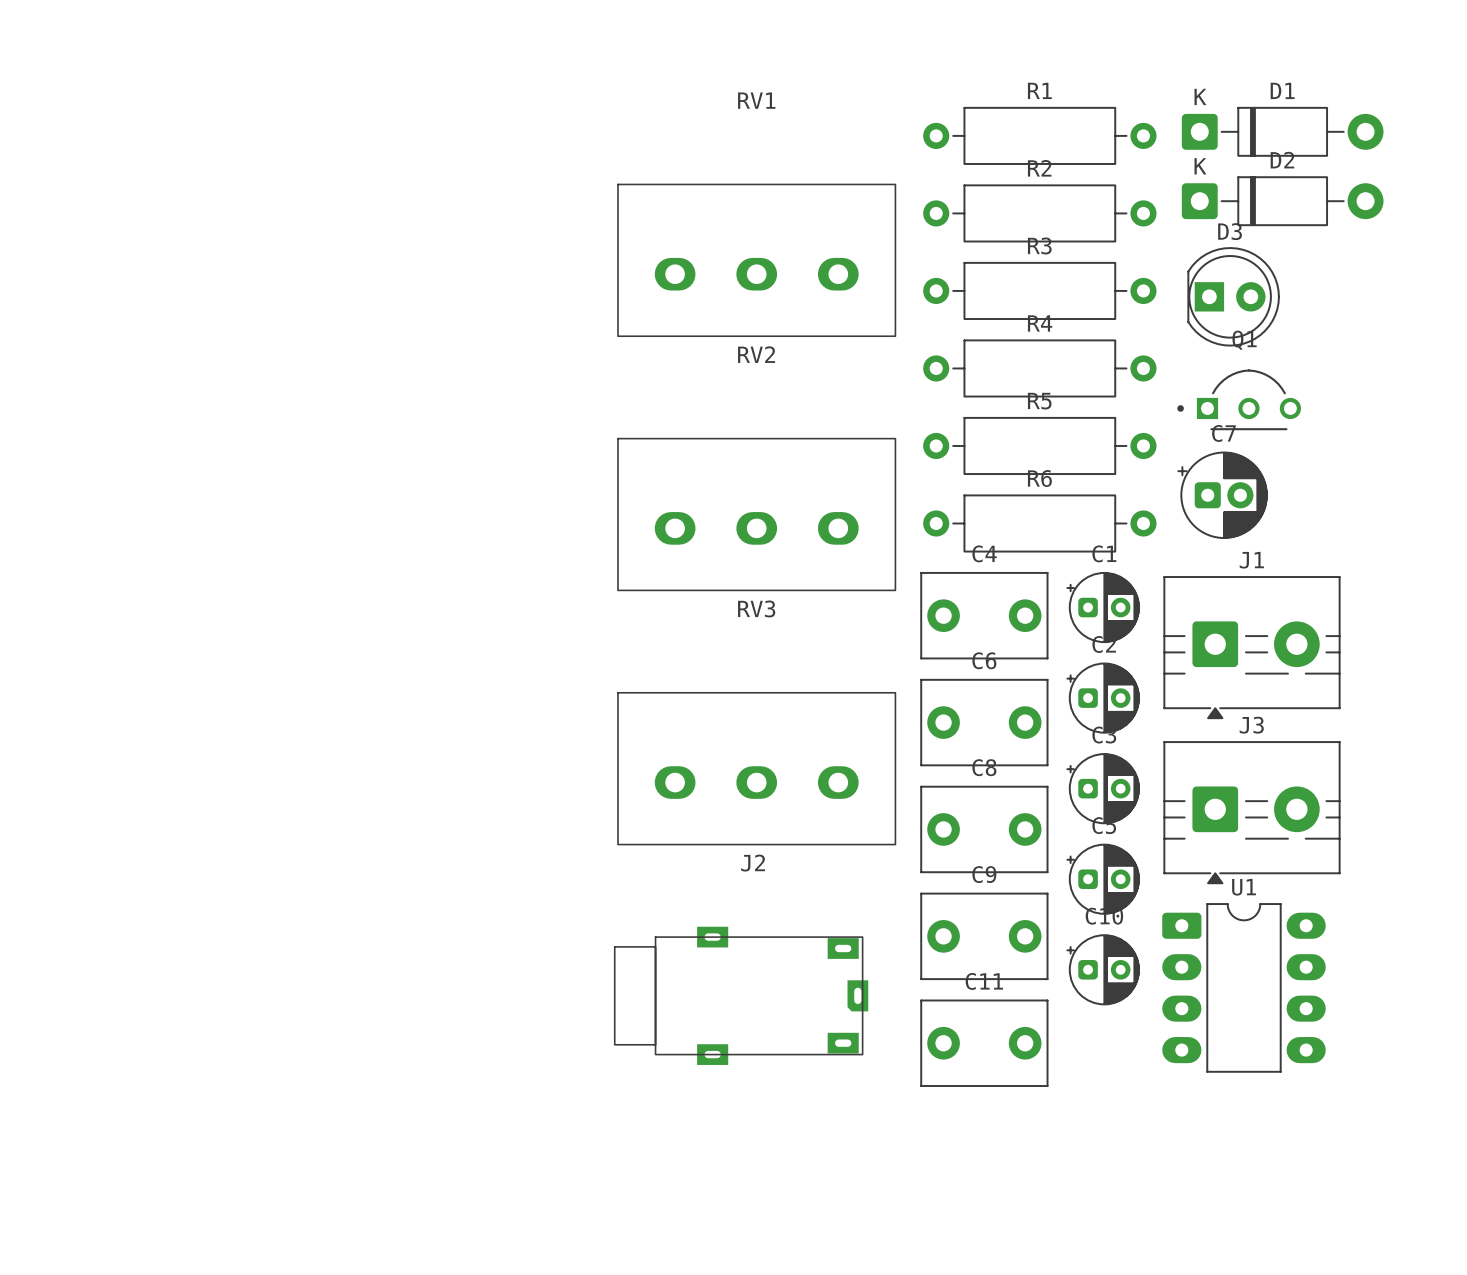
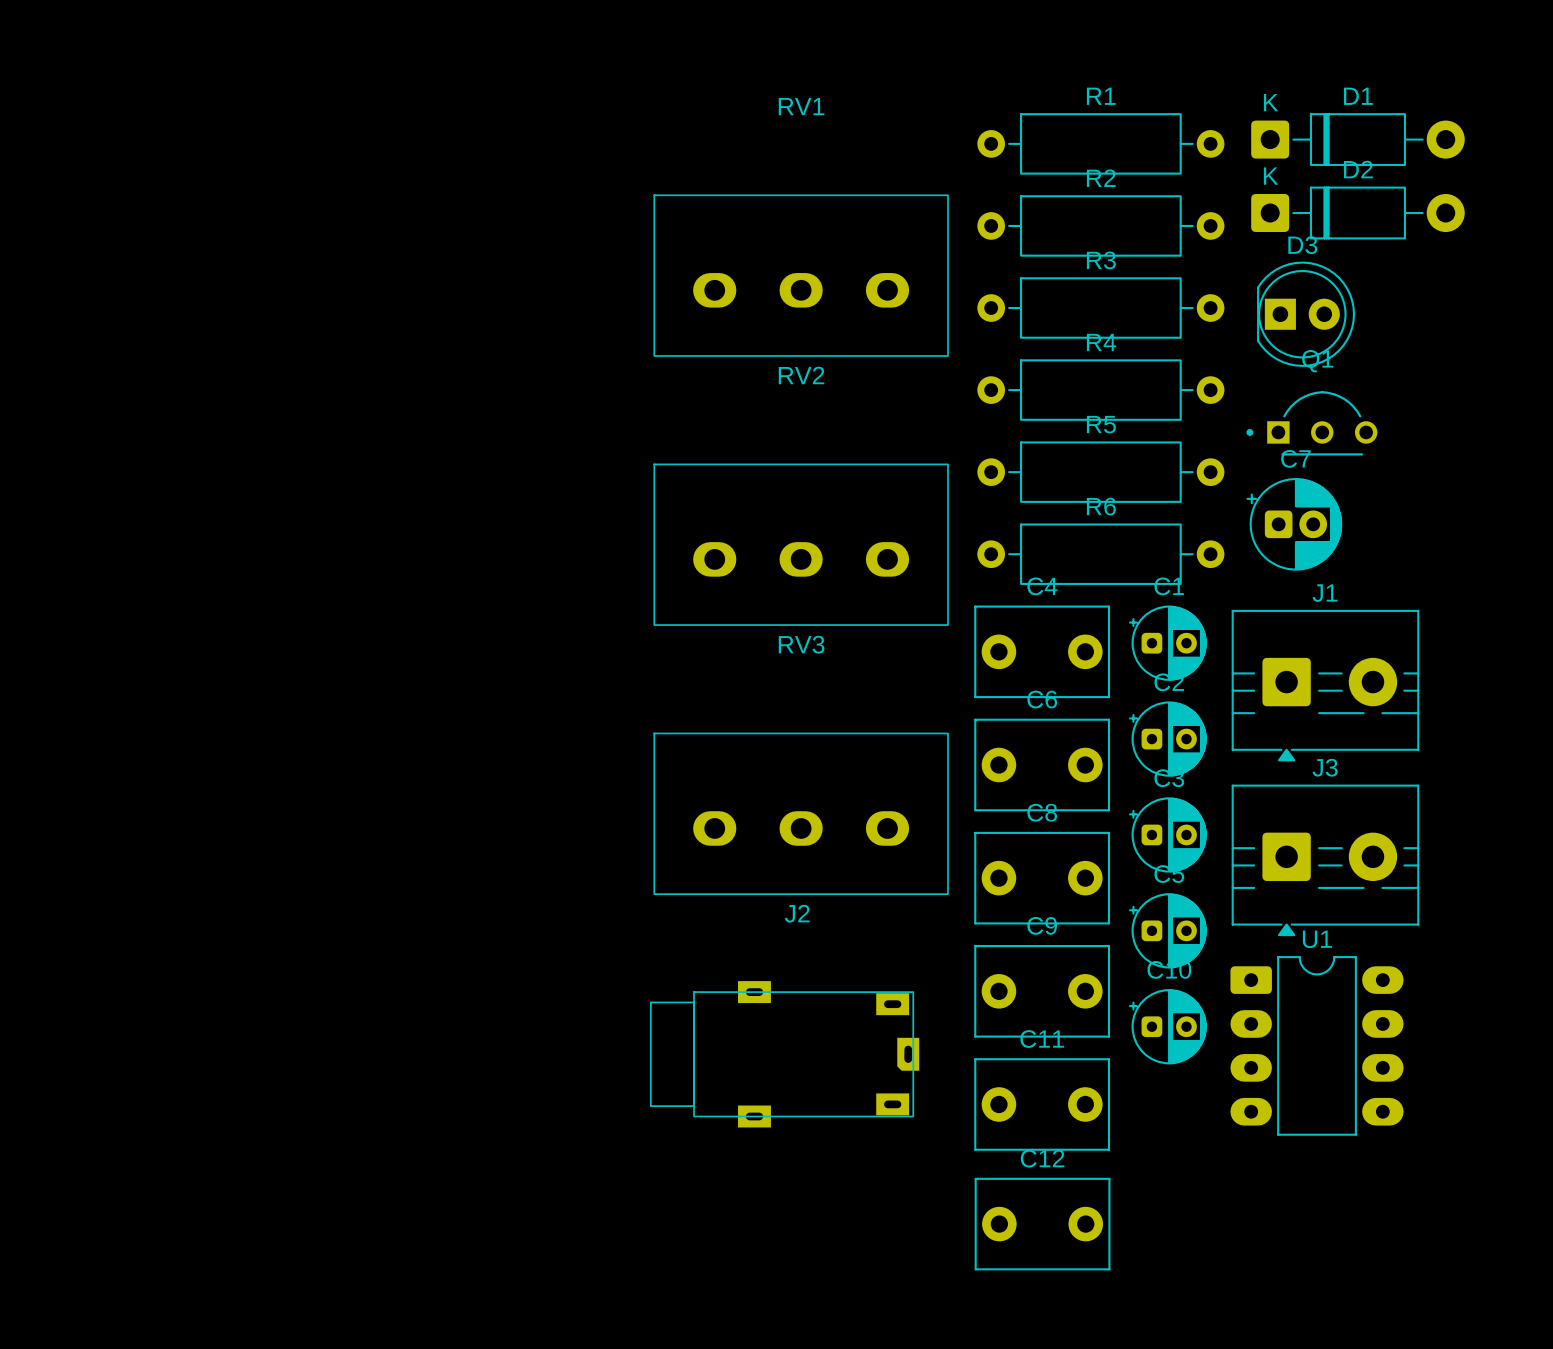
C12: none -> (1042, 1224)

